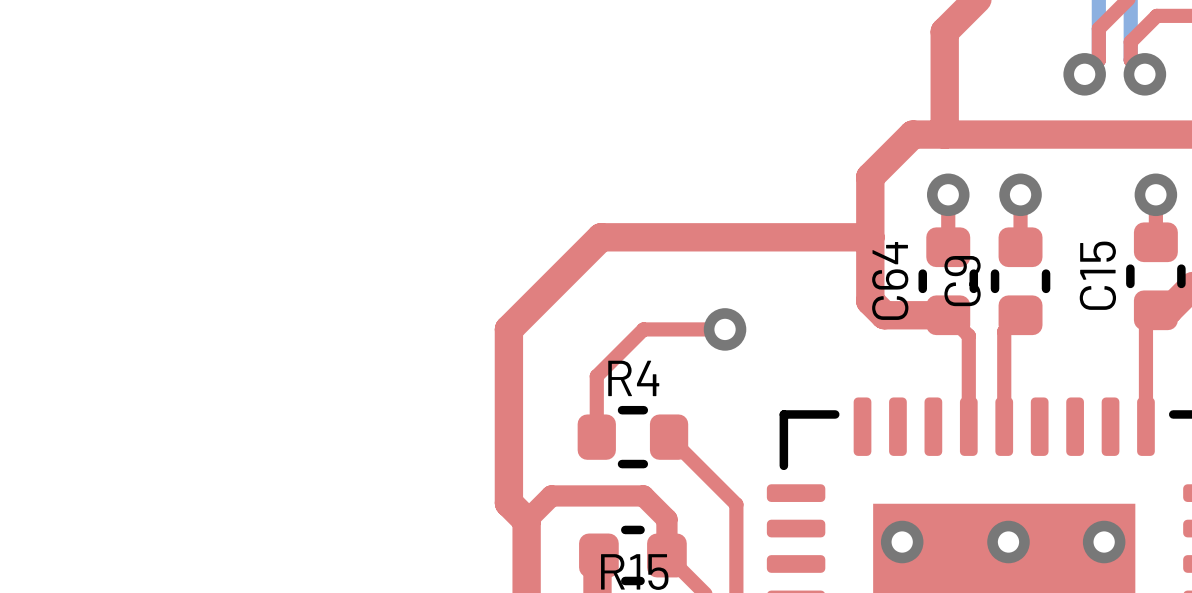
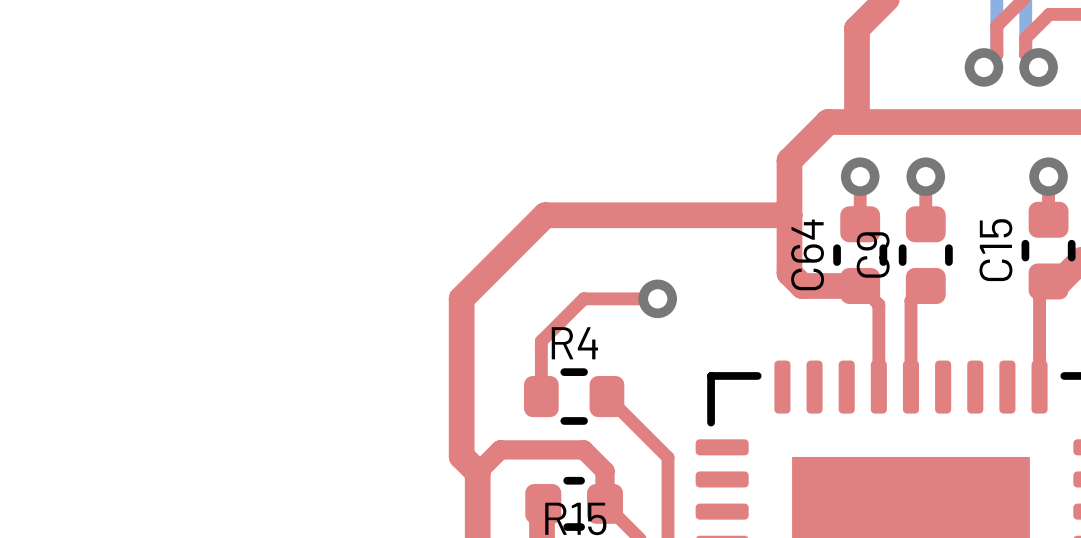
via: (902, 542) -> none
via: (1008, 542) -> none
via: (1104, 542) -> none

